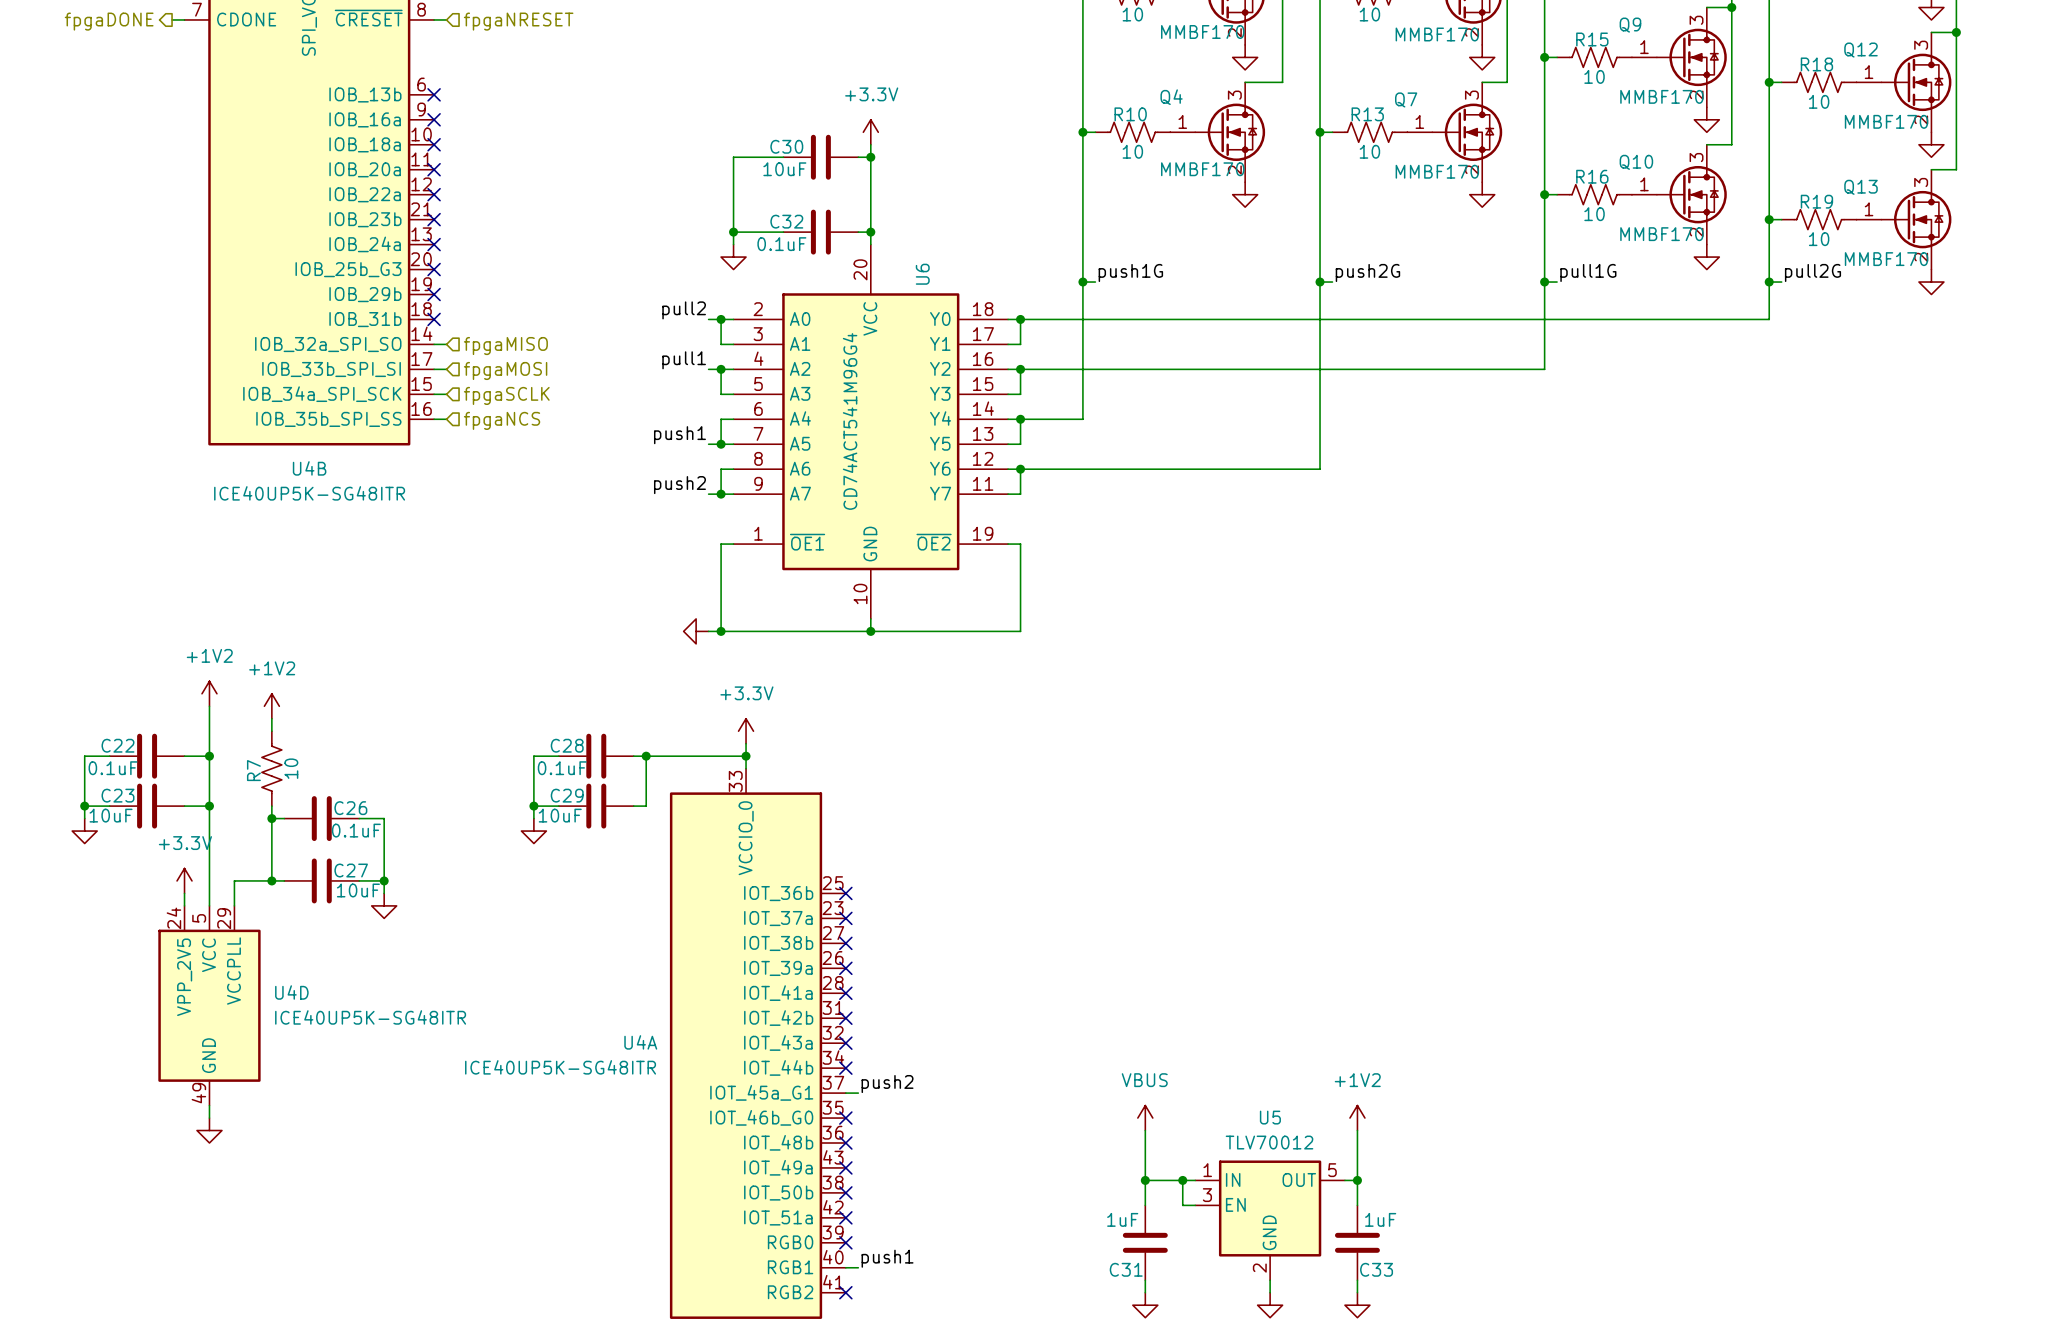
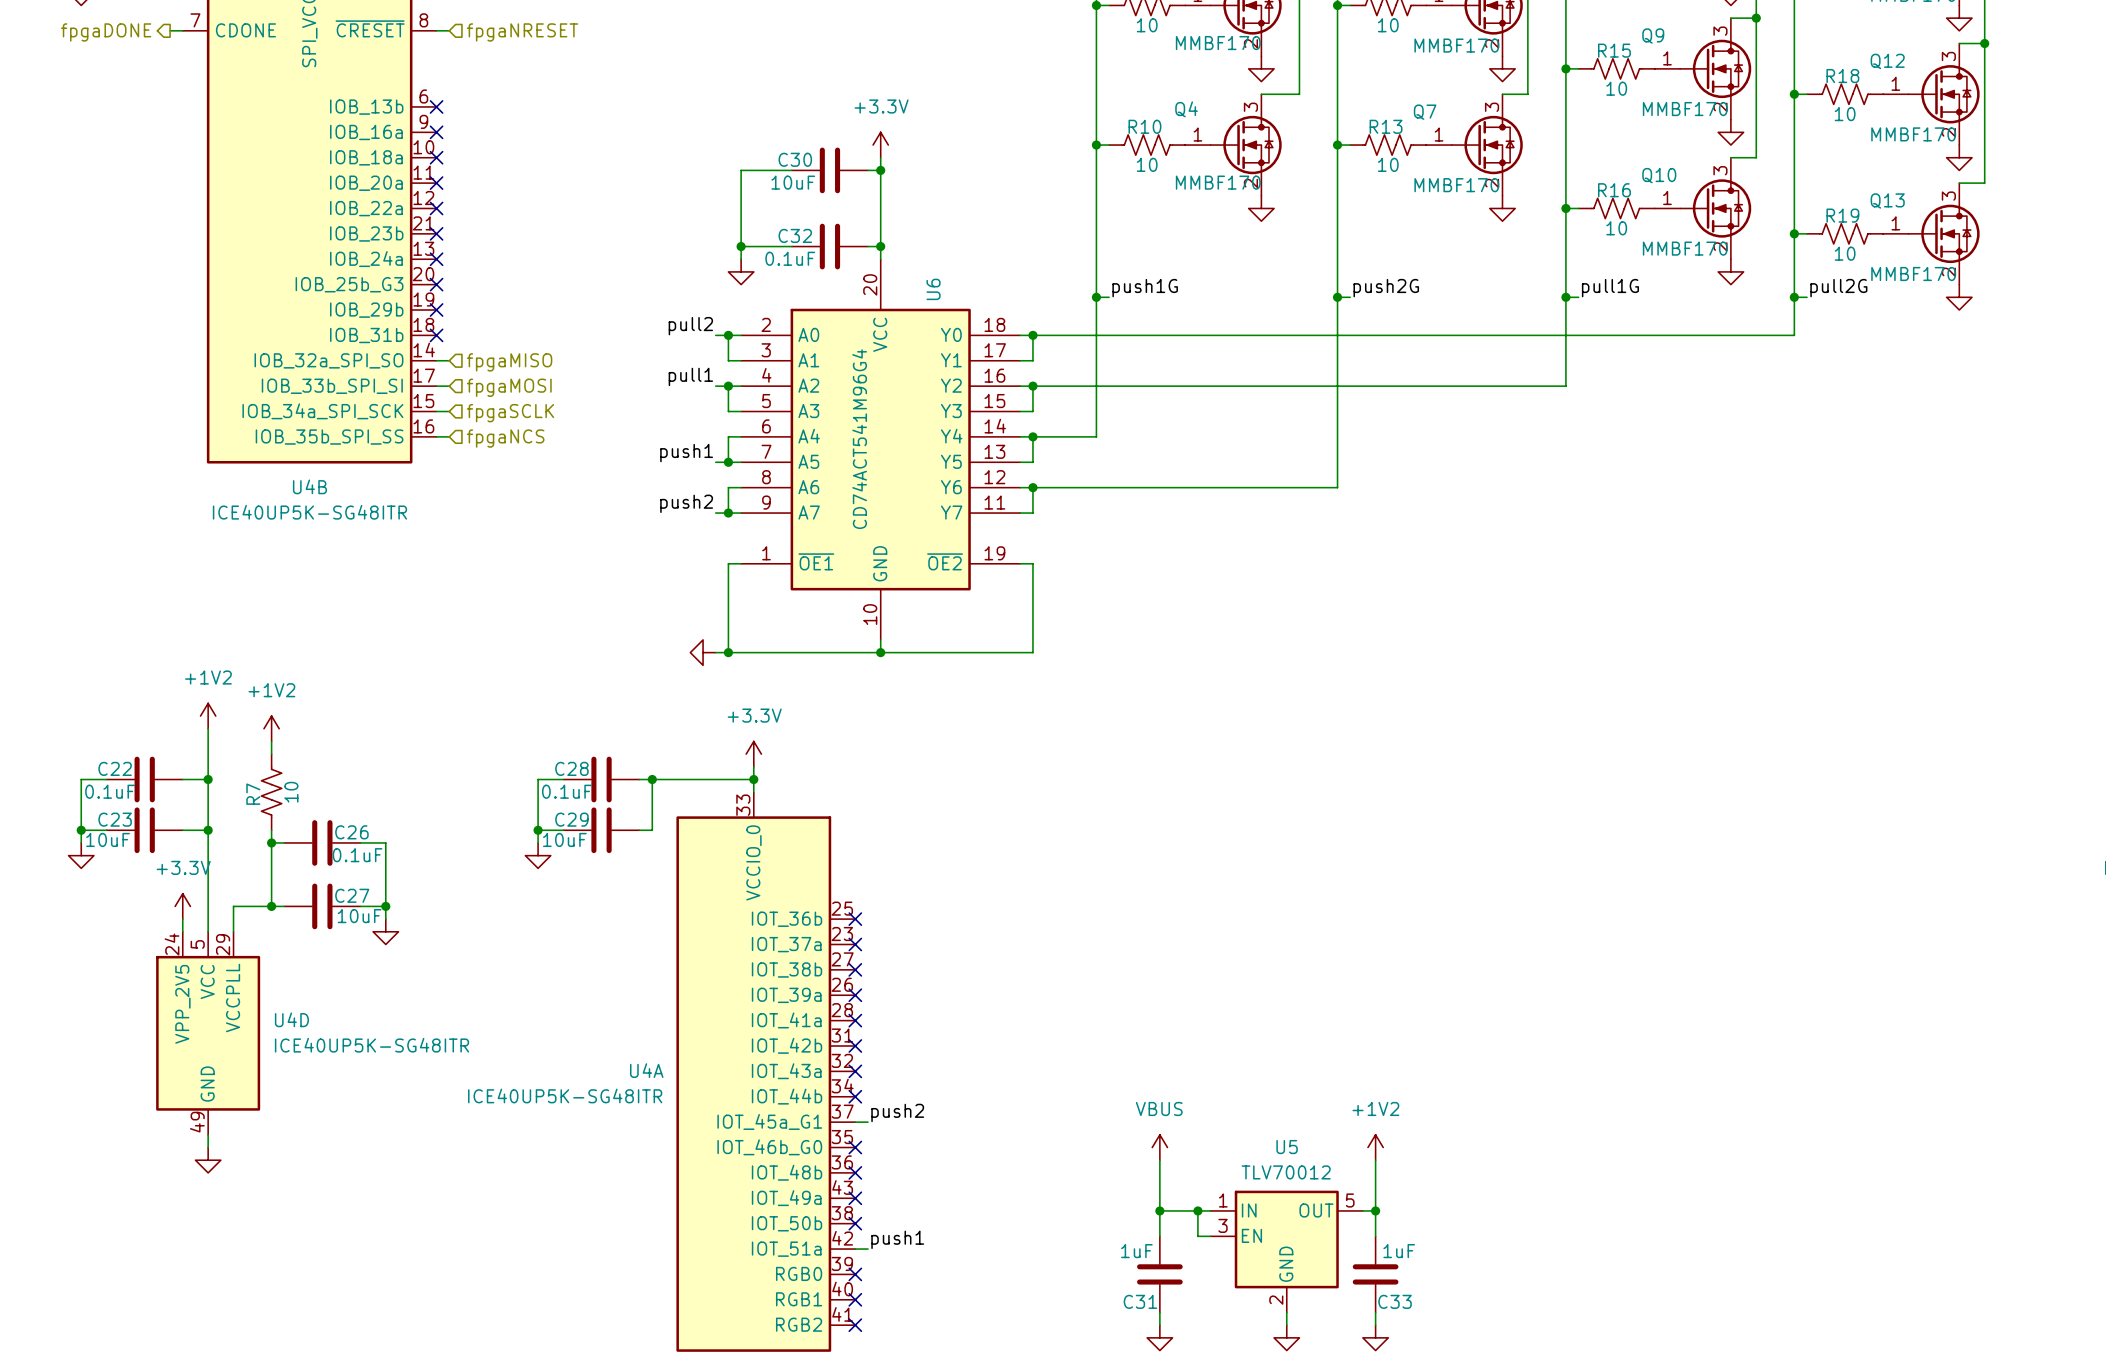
no-connect mark position: (845, 1217) -> (855, 1299)
label position: push1 (887, 1258) -> push1 (897, 1239)
wire: (845, 1267) (858, 1267) -> (855, 1249) (868, 1249)

